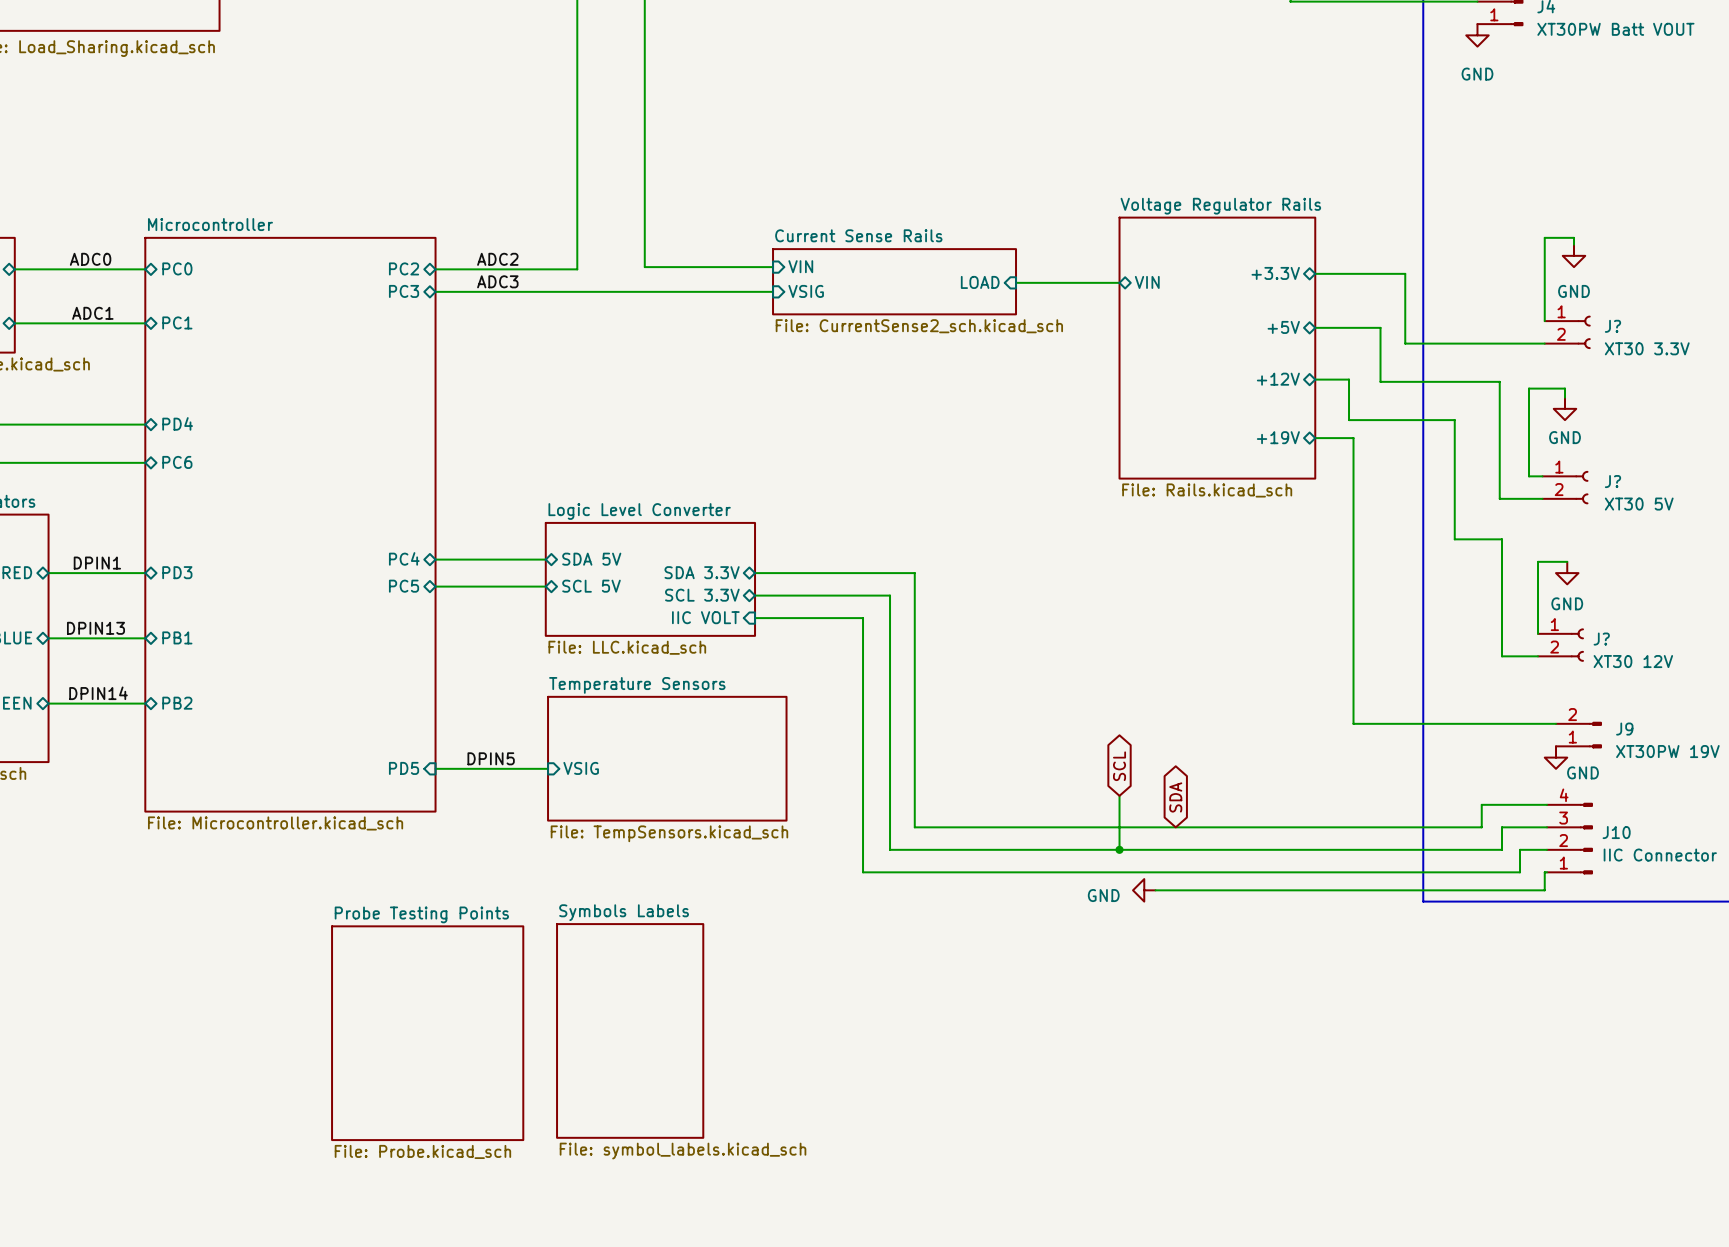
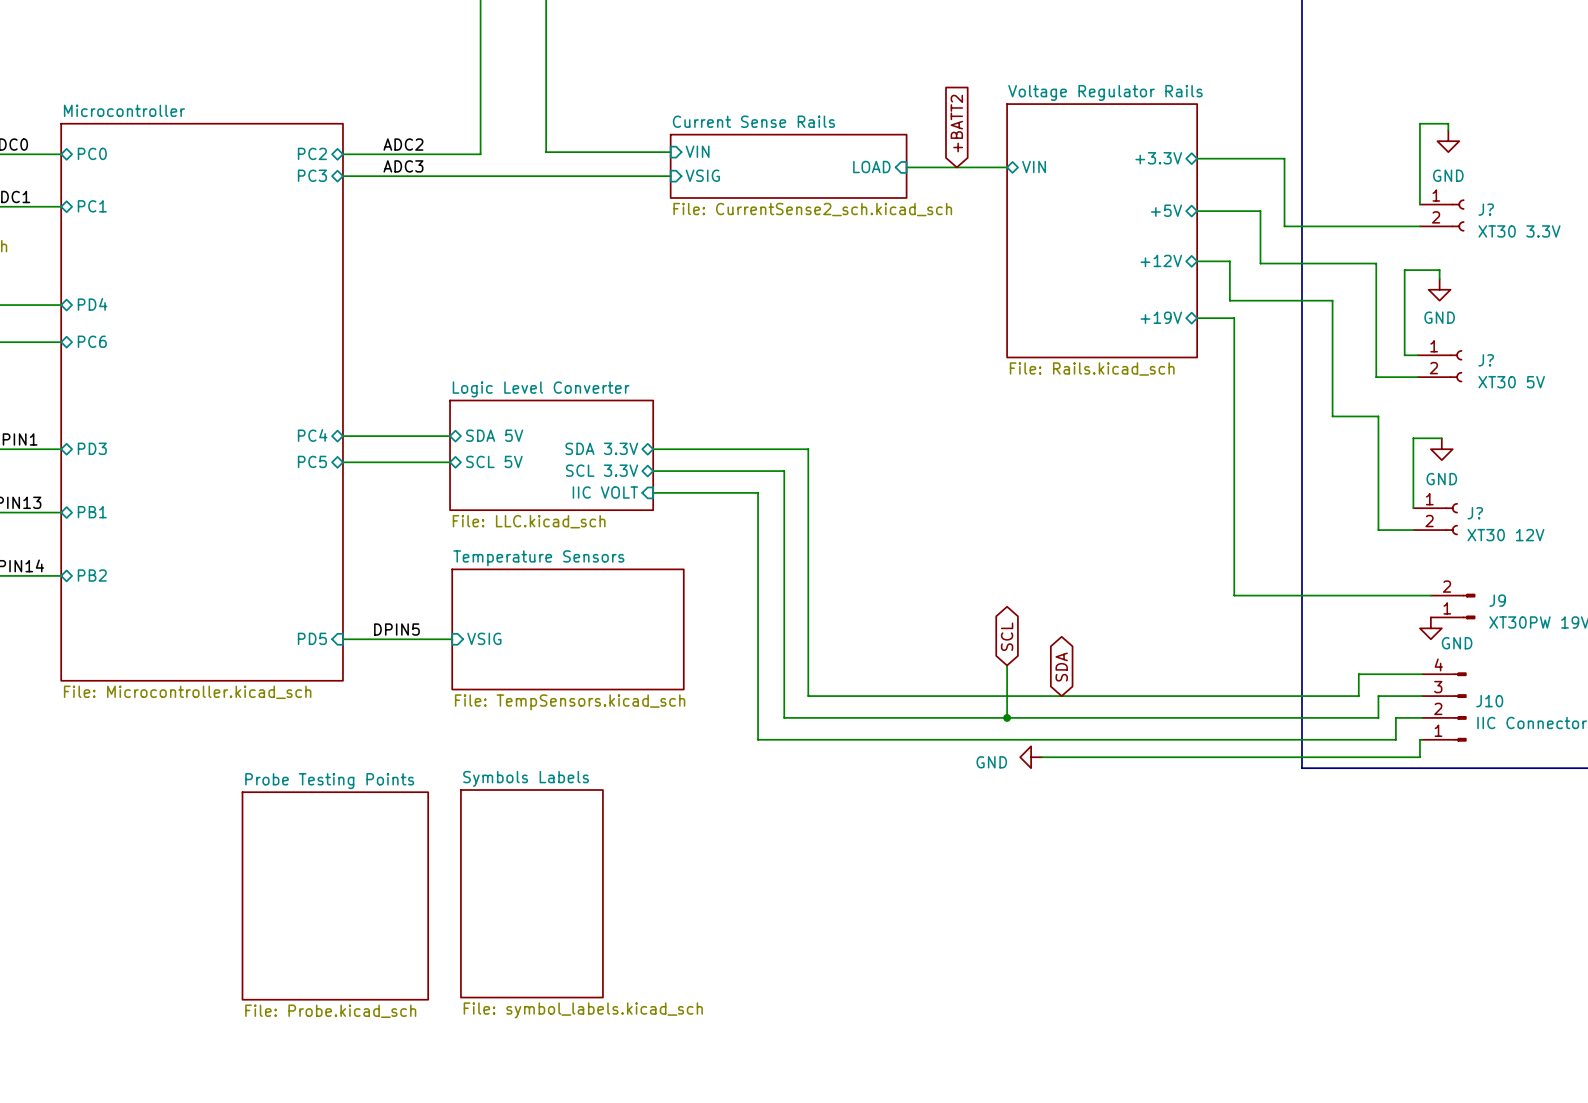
global label: none -> +BATT2 (956, 123)

